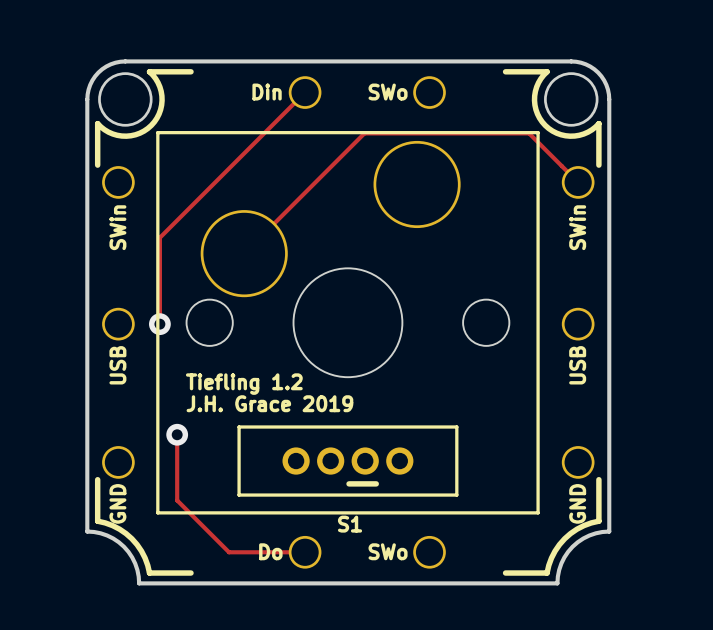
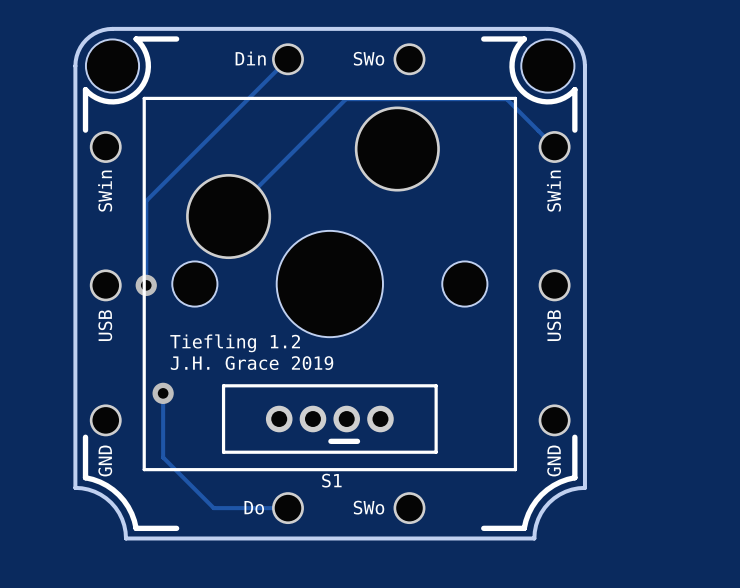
round board edge: [98, 72, 153, 127] -> none
round board edge: [544, 72, 599, 127] -> none
part: none -> (112, 66)
part: none -> (547, 66)

